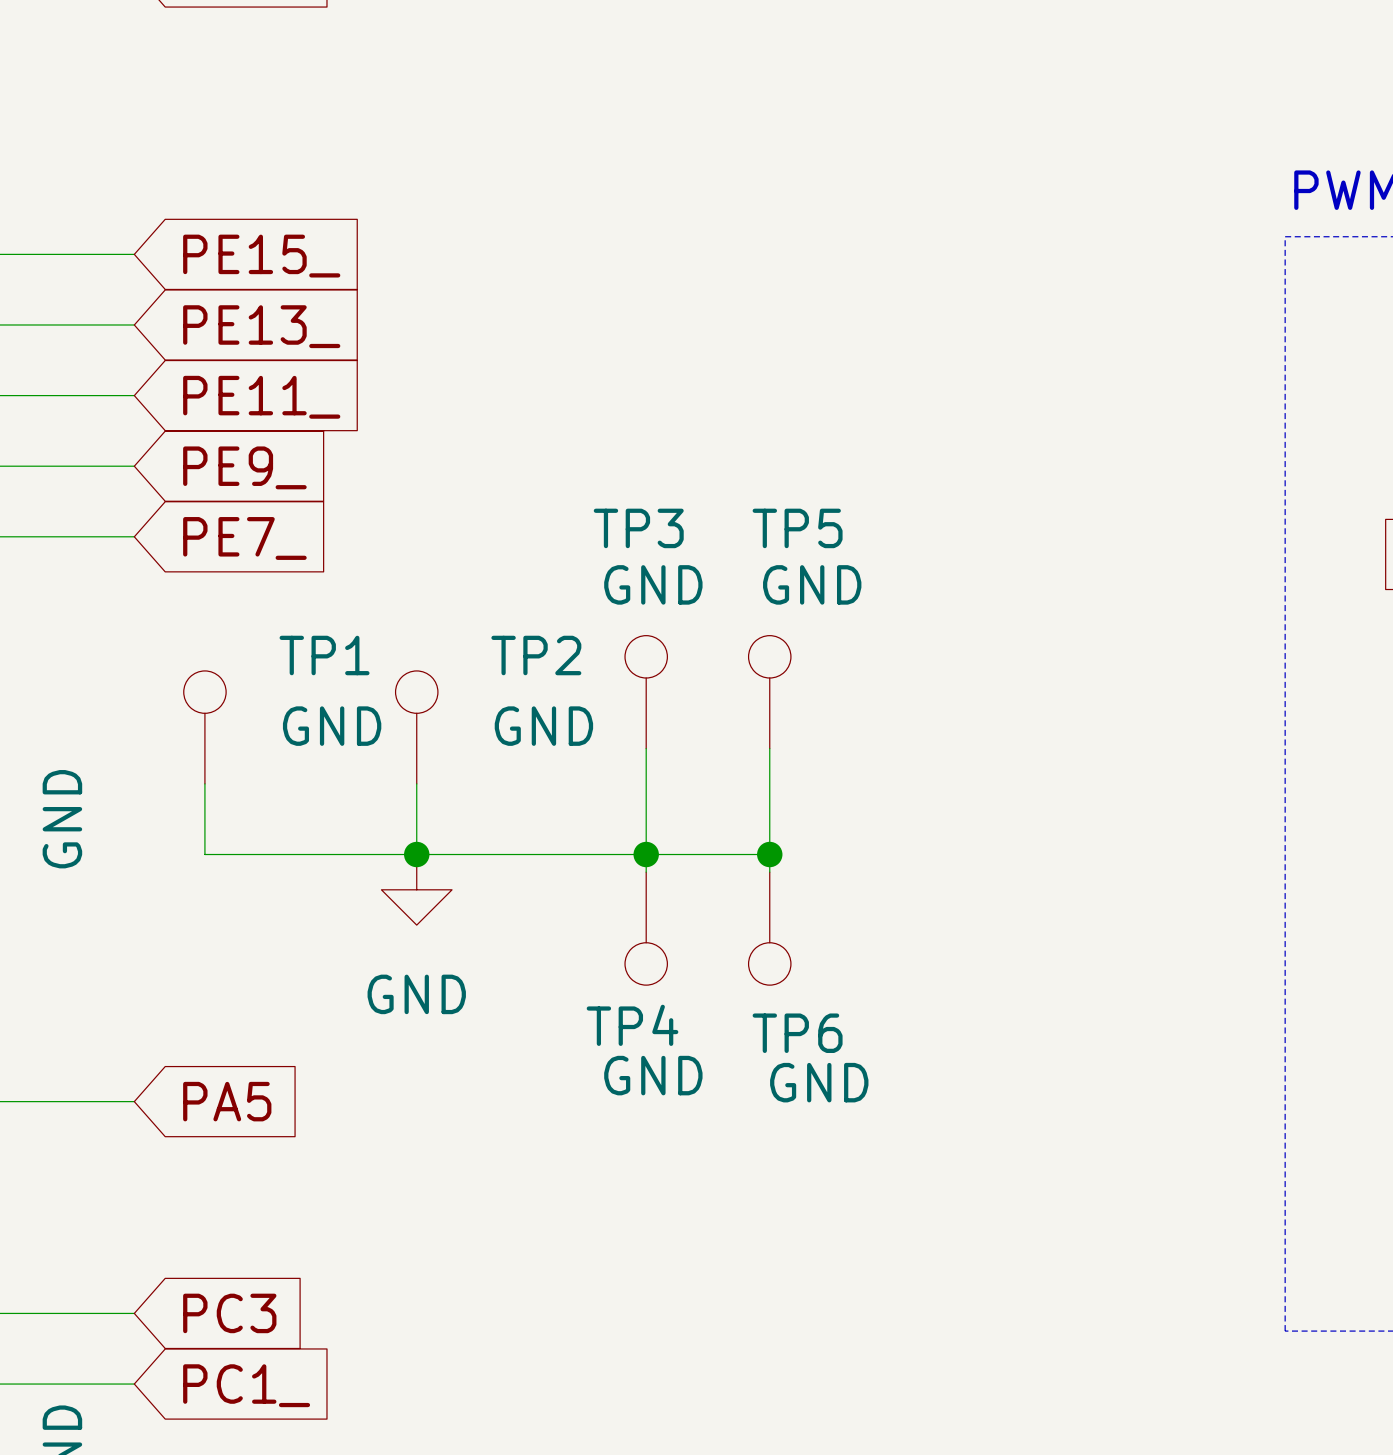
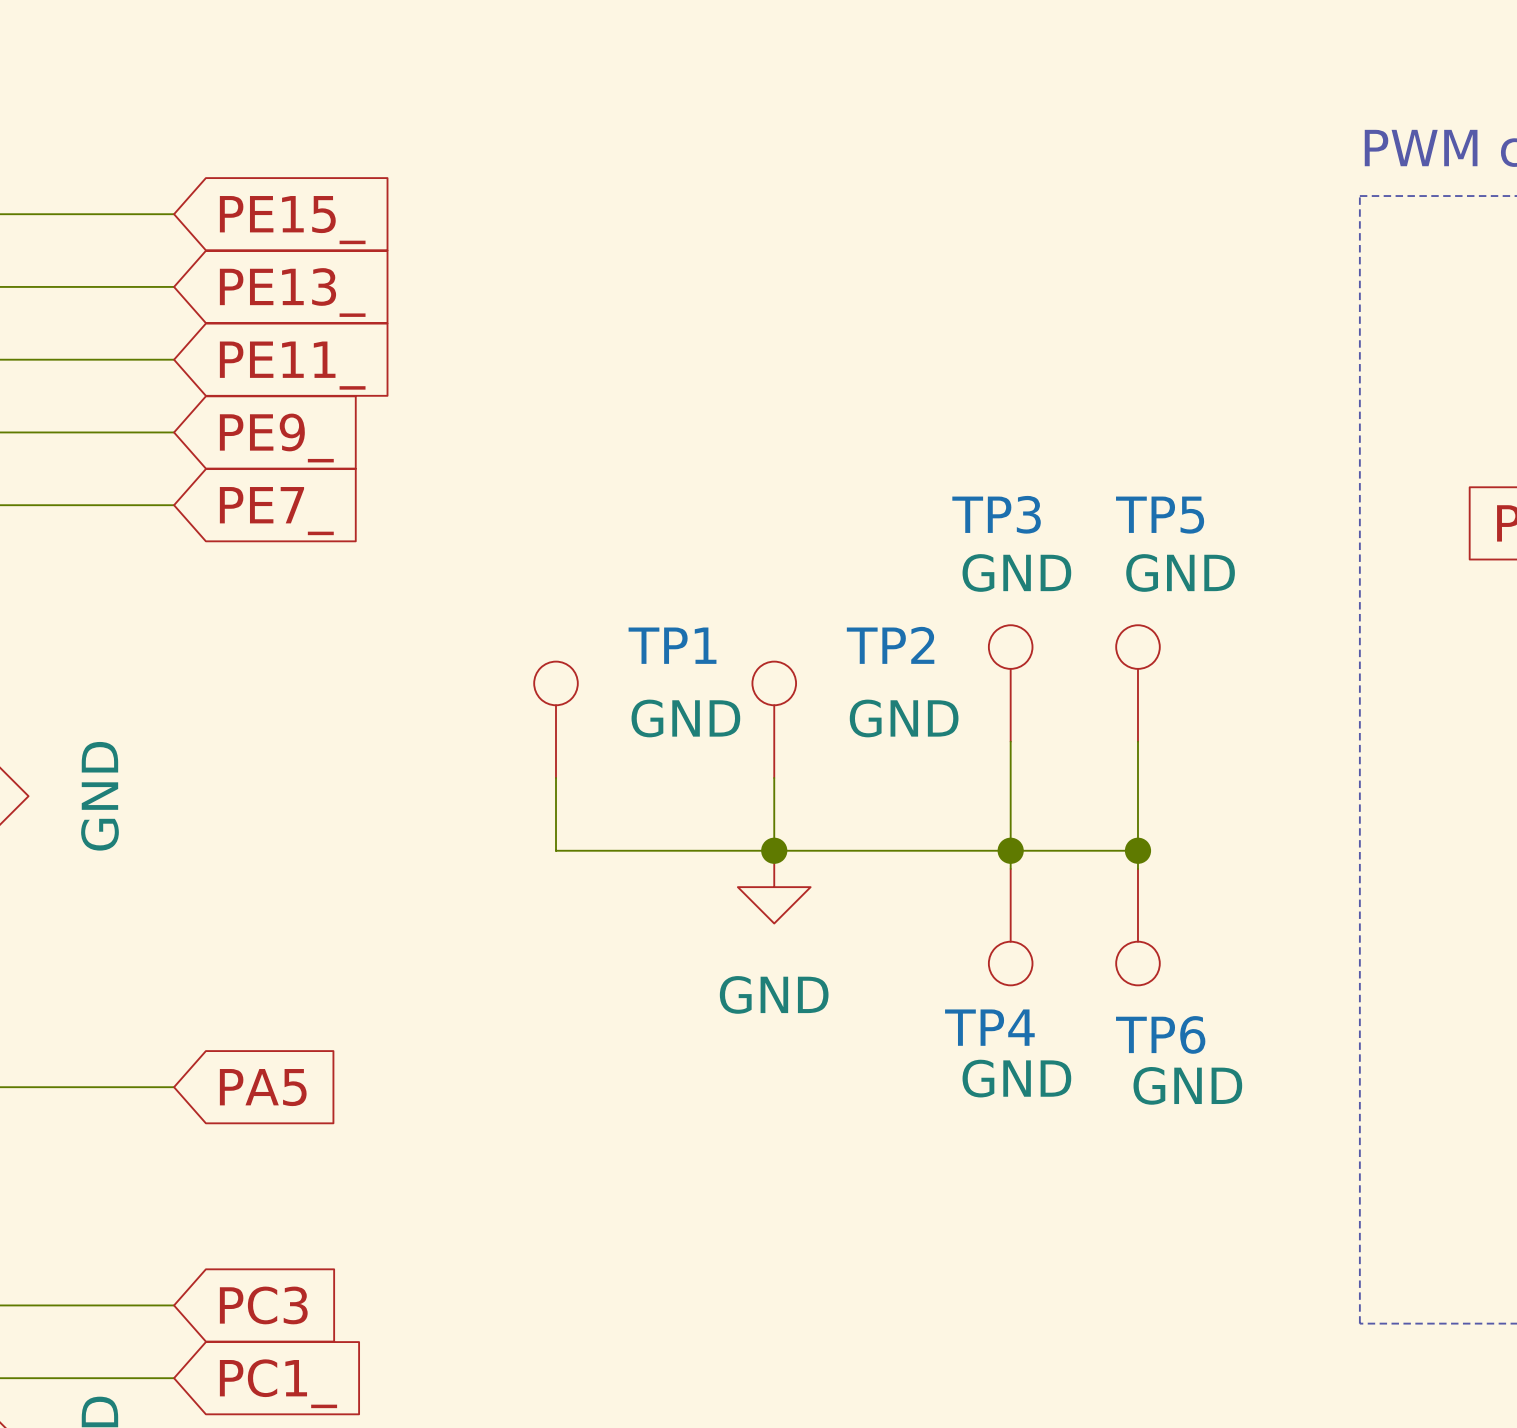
TP3 position: (646, 692) -> (1010, 683)
TP5 position: (769, 692) -> (1137, 683)
TP1 position: (204, 727) -> (556, 719)
TP2 position: (416, 727) -> (774, 719)
wire: (646, 748) (646, 872) -> (1010, 741) (1010, 868)
wire: (769, 748) (769, 872) -> (1137, 741) (1137, 868)
wire: (204, 783) (204, 854) (769, 854) -> (556, 778) (556, 850) (1137, 850)
wire: (416, 783) (416, 854) -> (774, 778) (774, 850)
junction: (416, 854) -> none
junction: (646, 854) -> none
junction: (769, 854) -> none
junction: none -> (774, 850)
junction: none -> (1010, 850)
junction: none -> (1137, 850)
power symbol position: GND (416, 889) -> GND (774, 887)
TP4 position: (646, 928) -> (1010, 927)
TP6 position: (769, 928) -> (1137, 927)

